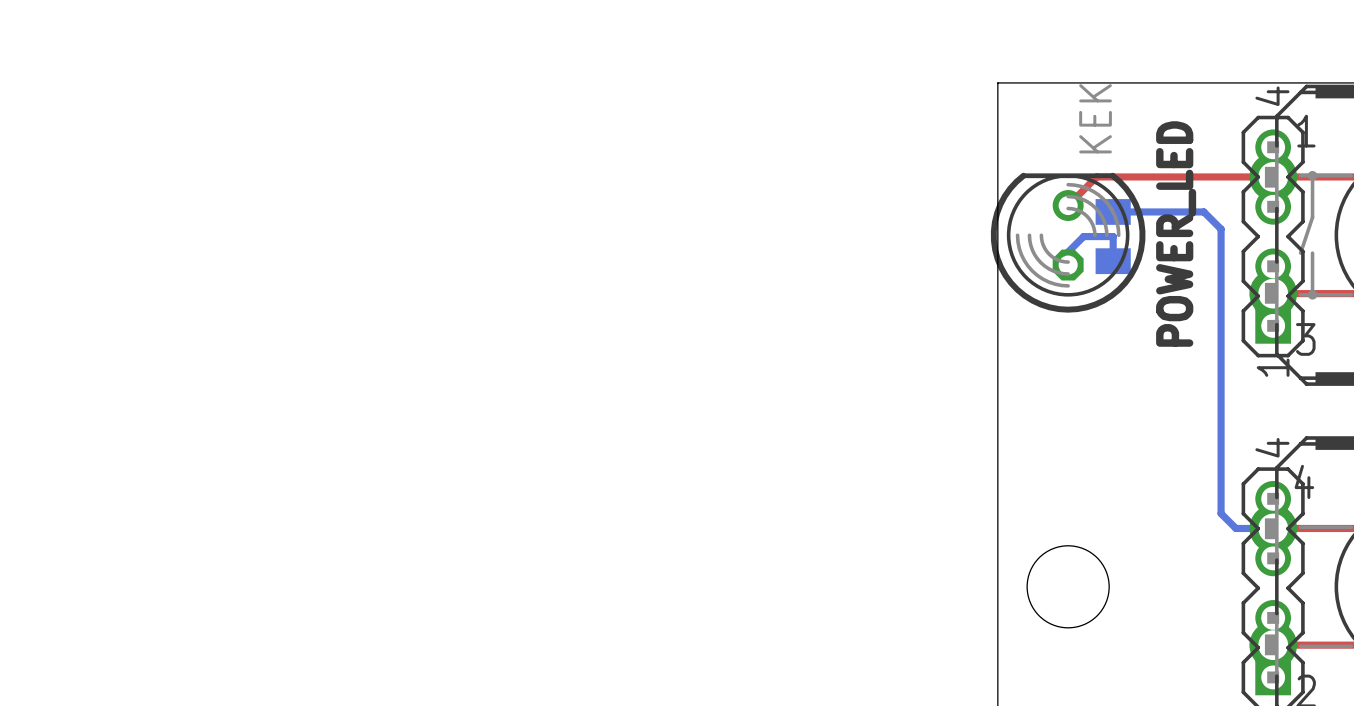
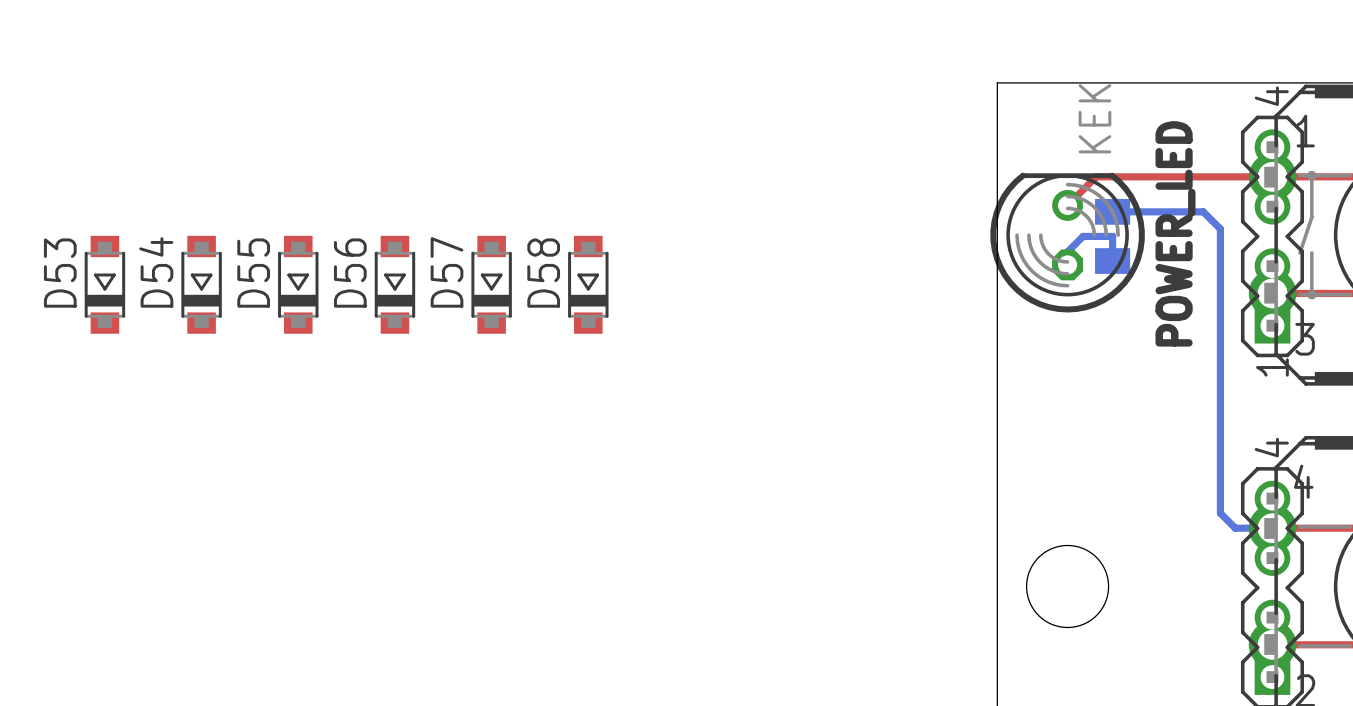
D53: none -> (104, 284)
D54: none -> (201, 284)
D55: none -> (298, 284)
D56: none -> (394, 284)
D57: none -> (491, 284)
D58: none -> (588, 284)

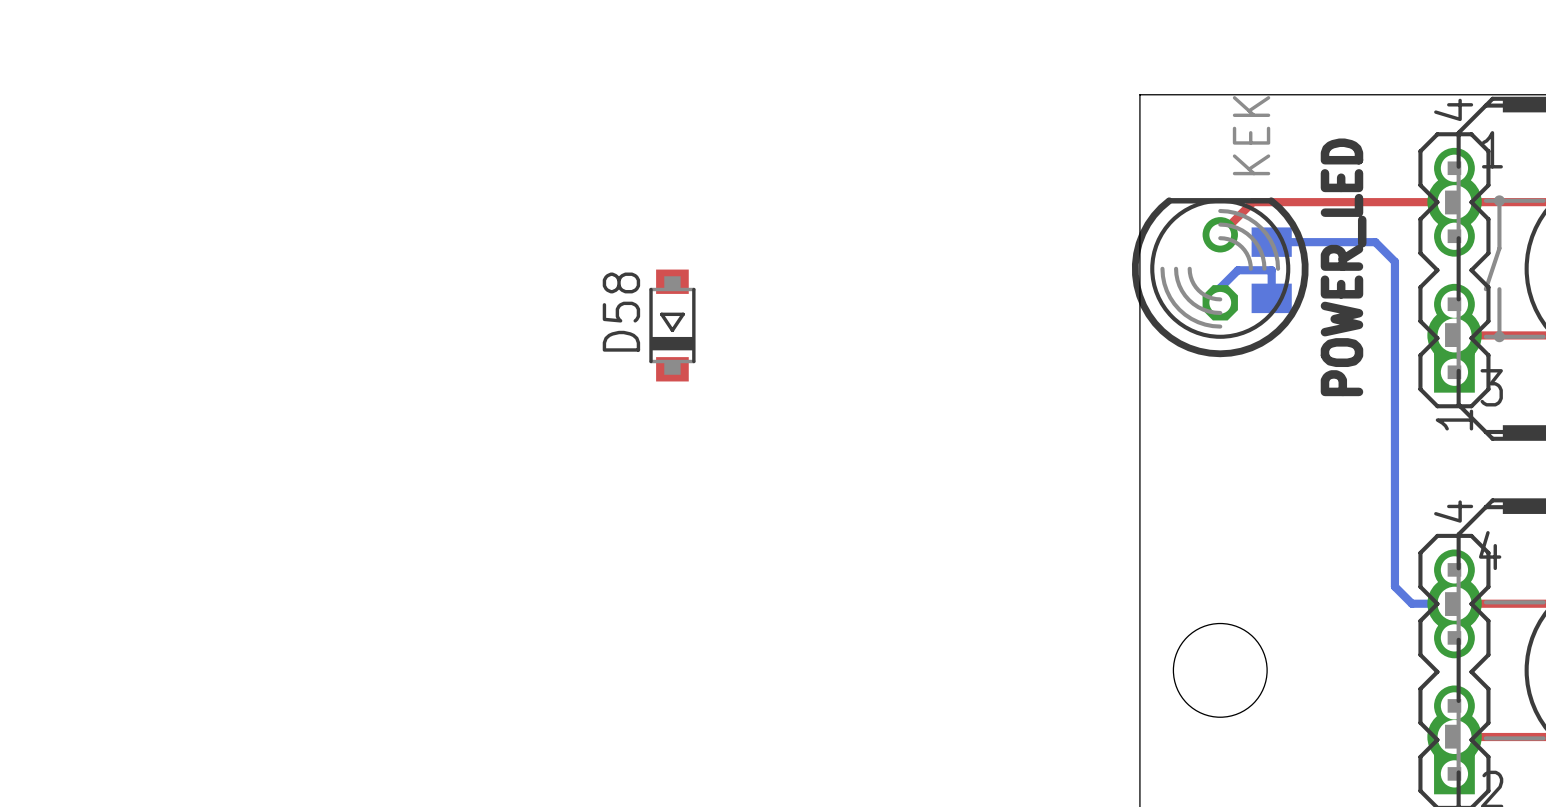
D53: (104, 284) -> none
D54: (201, 284) -> none
D55: (298, 284) -> none
D56: (394, 284) -> none
D57: (491, 284) -> none

